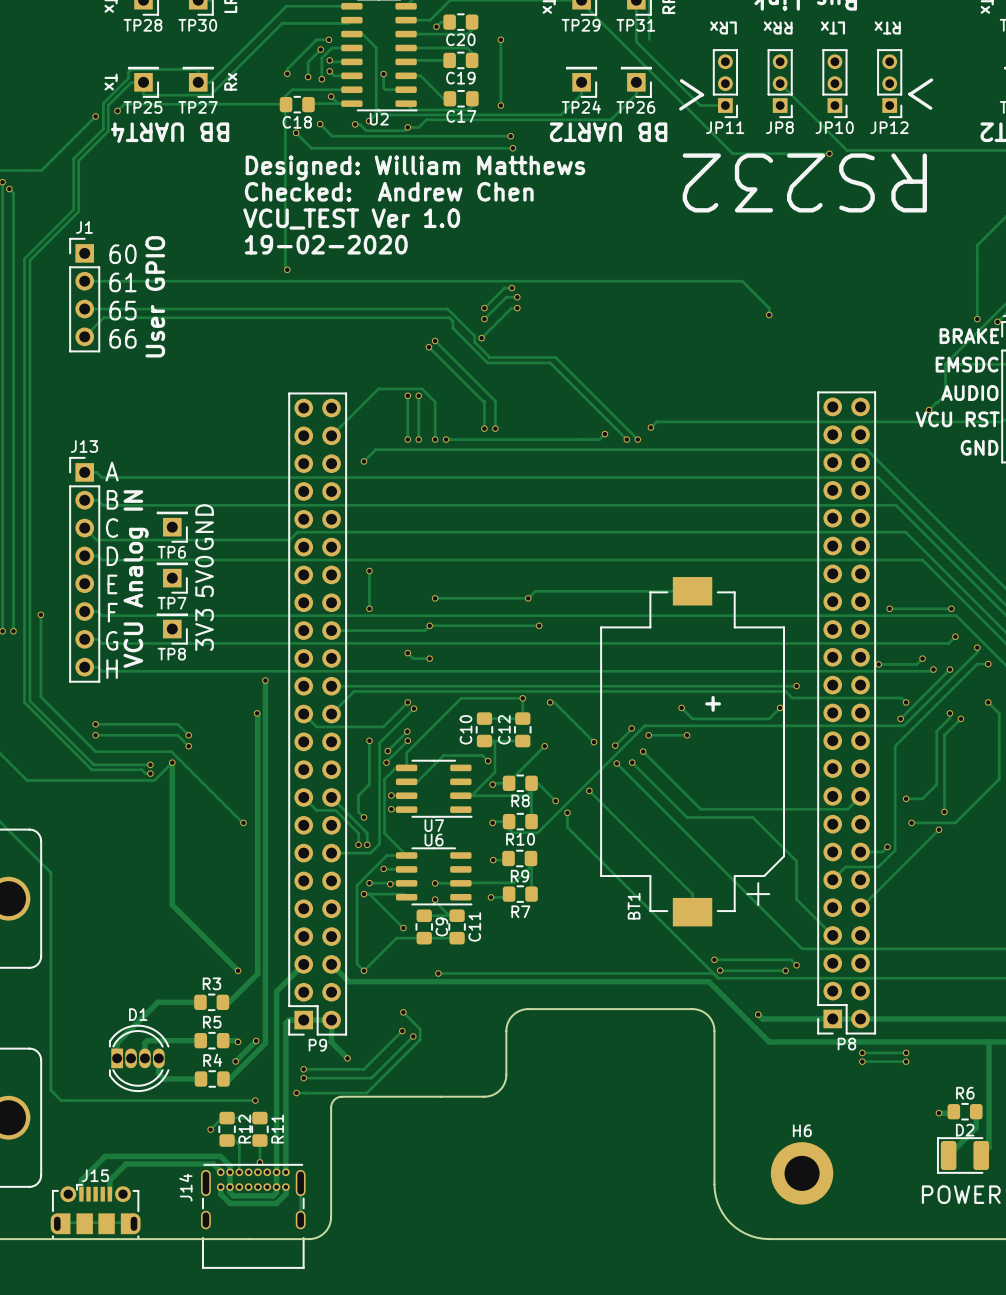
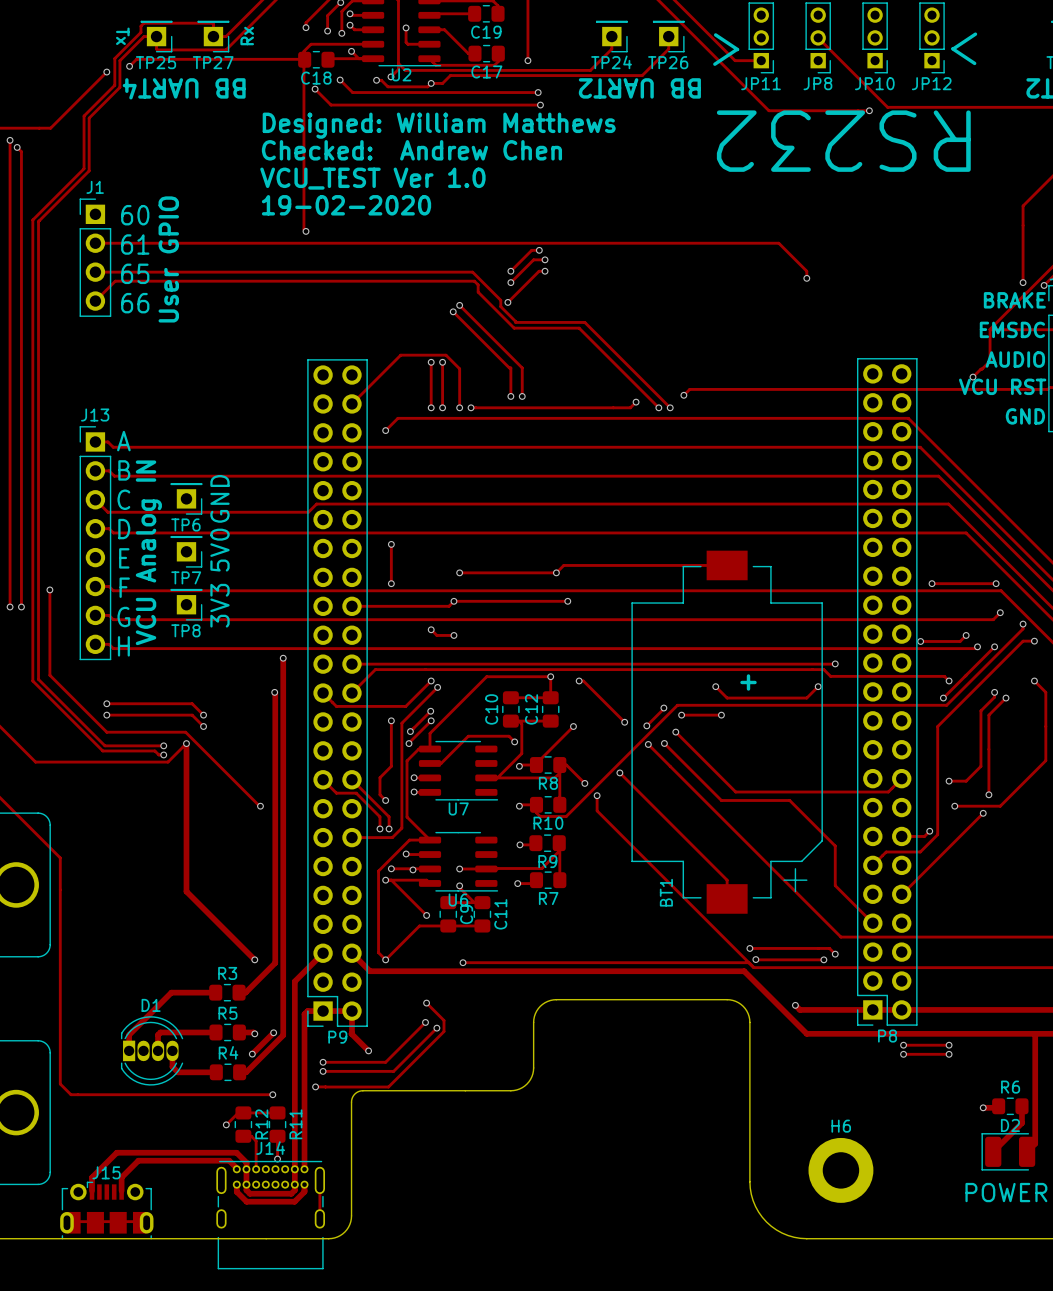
U6 name position: U6 (434, 840) -> U6 (458, 900)
J14 name rotation: 0° (185, 1187) -> 90° clockwise (270, 1148)
J14 name position: J14 (185, 1187) -> J14 (270, 1148)

